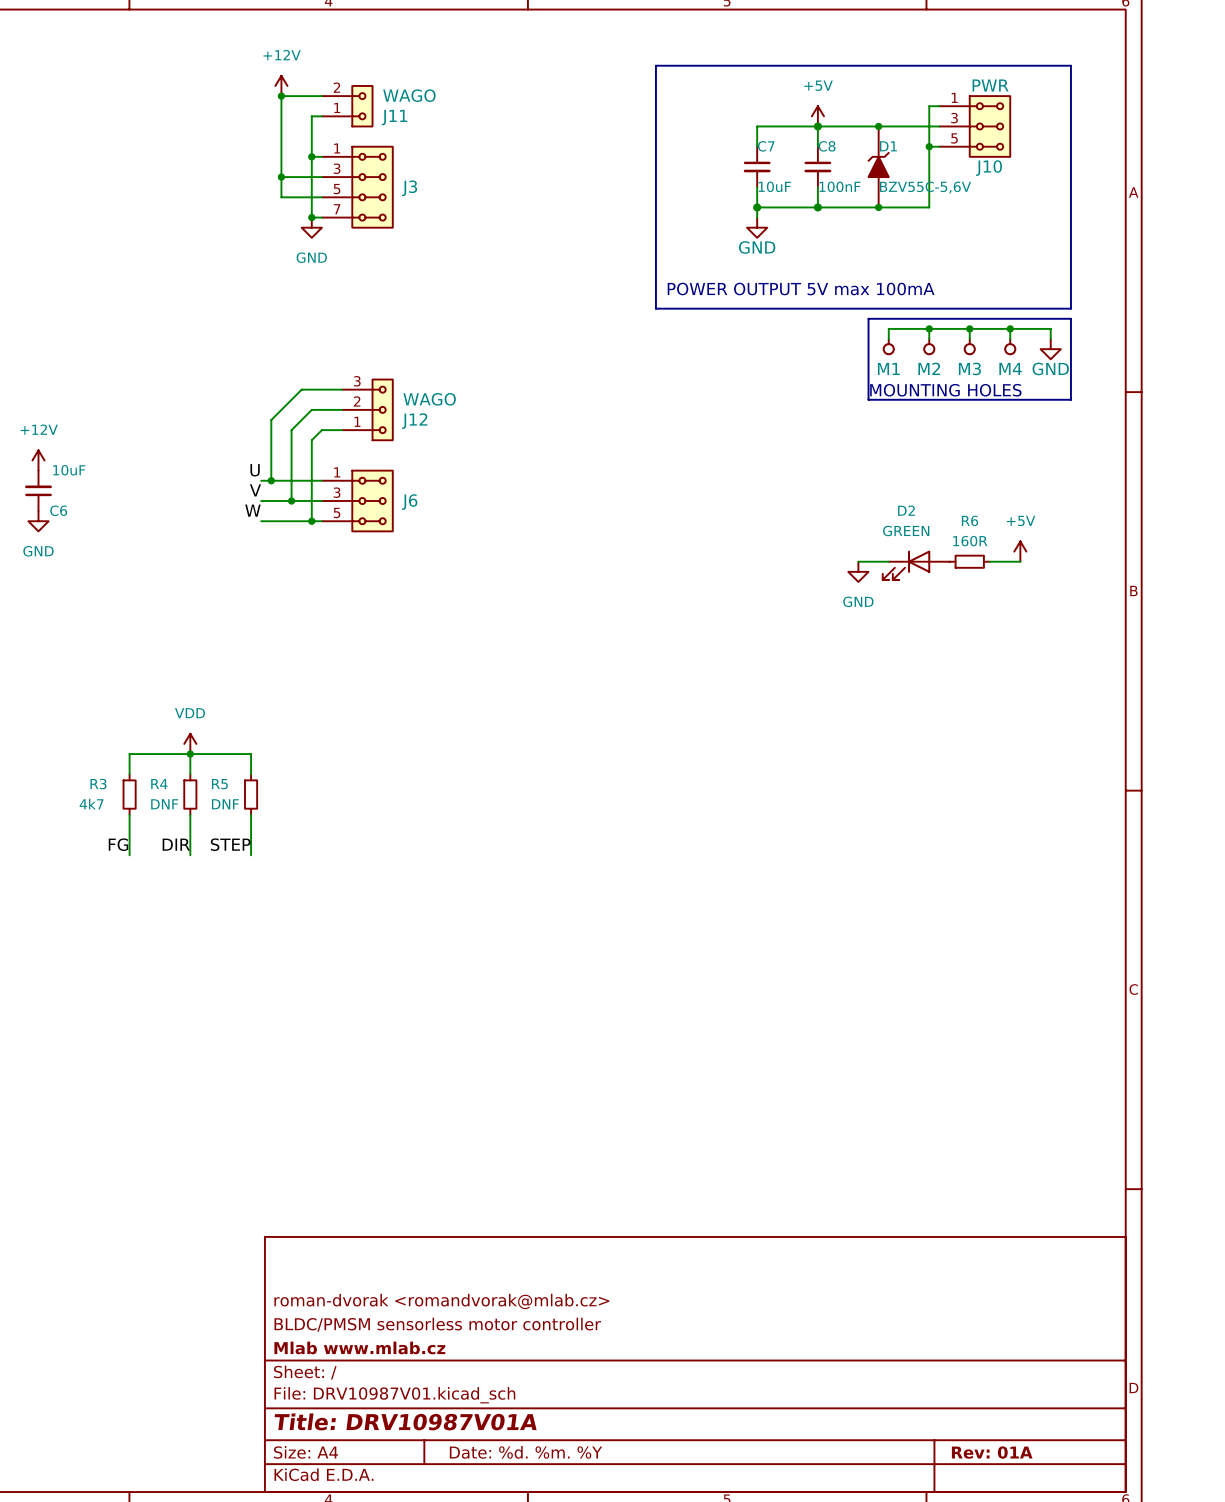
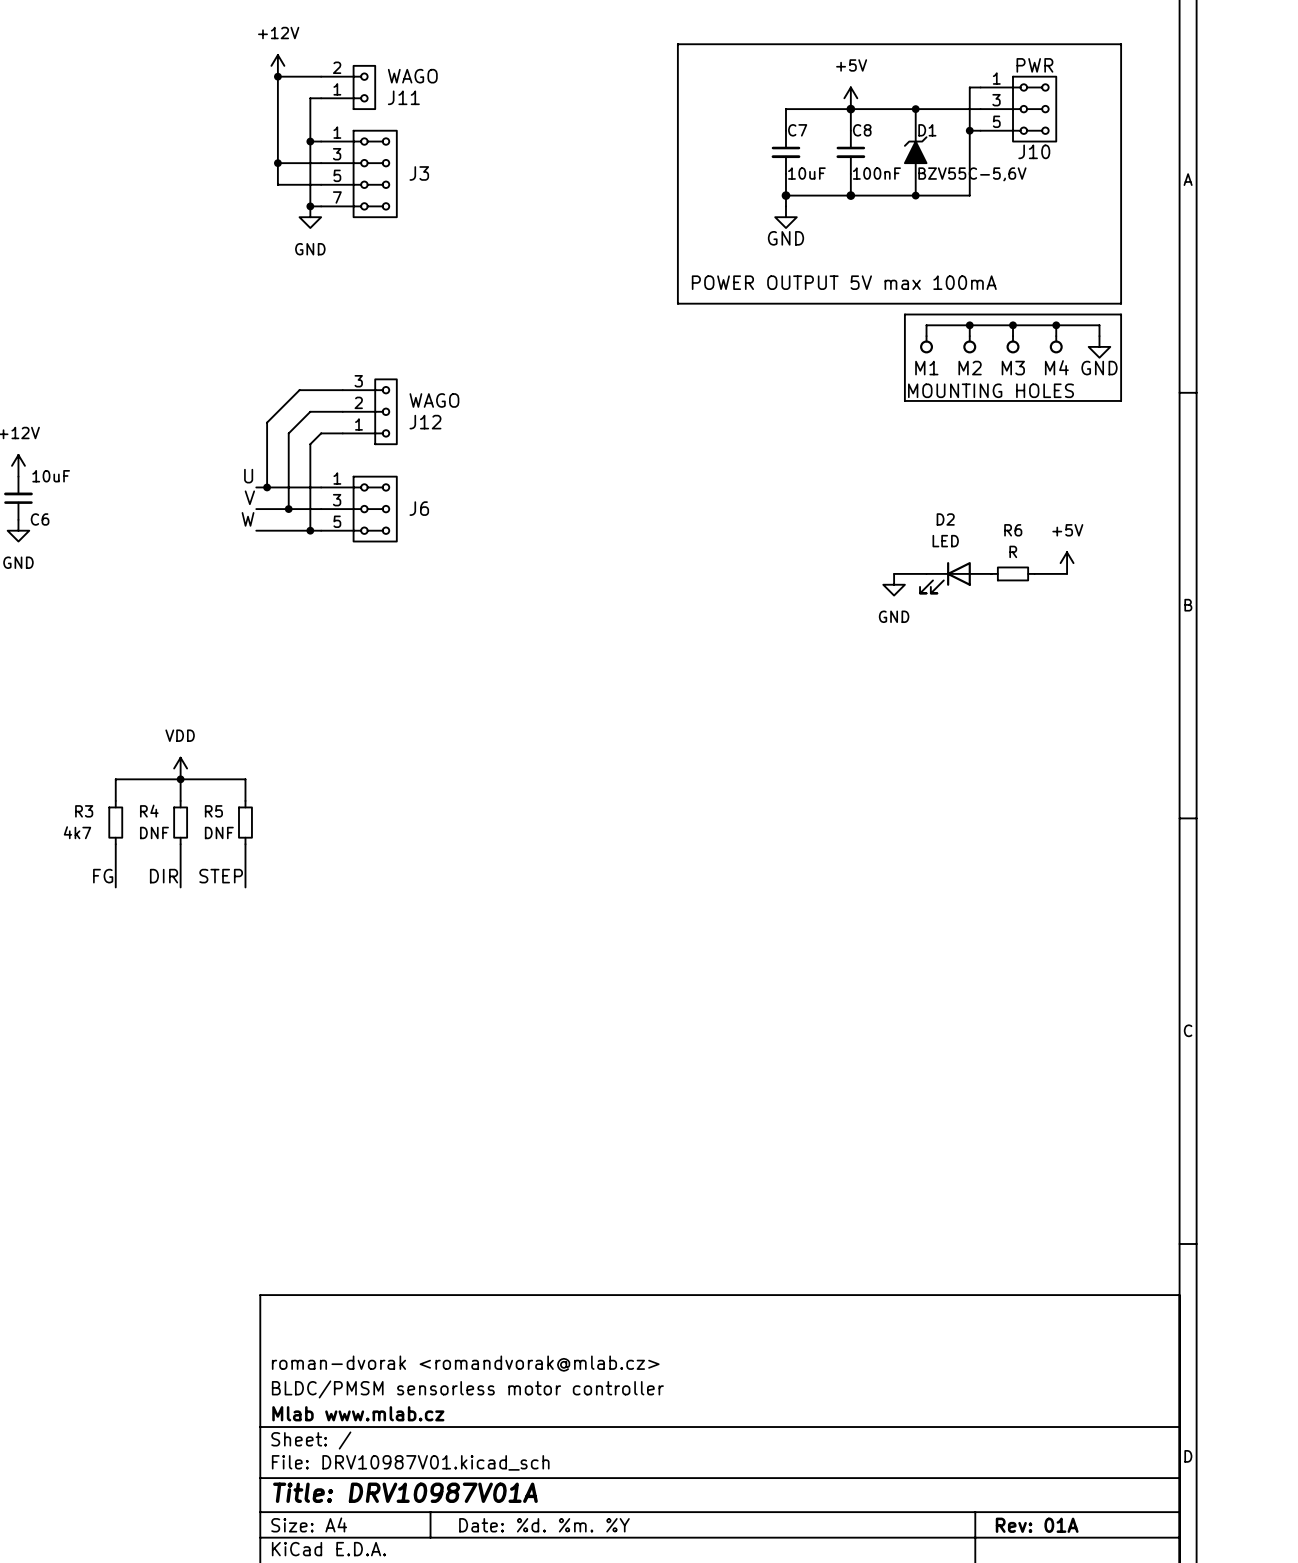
D2 value: GREEN (906, 530) -> LED (945, 541)
R6 value: 160R (970, 541) -> R (1013, 551)

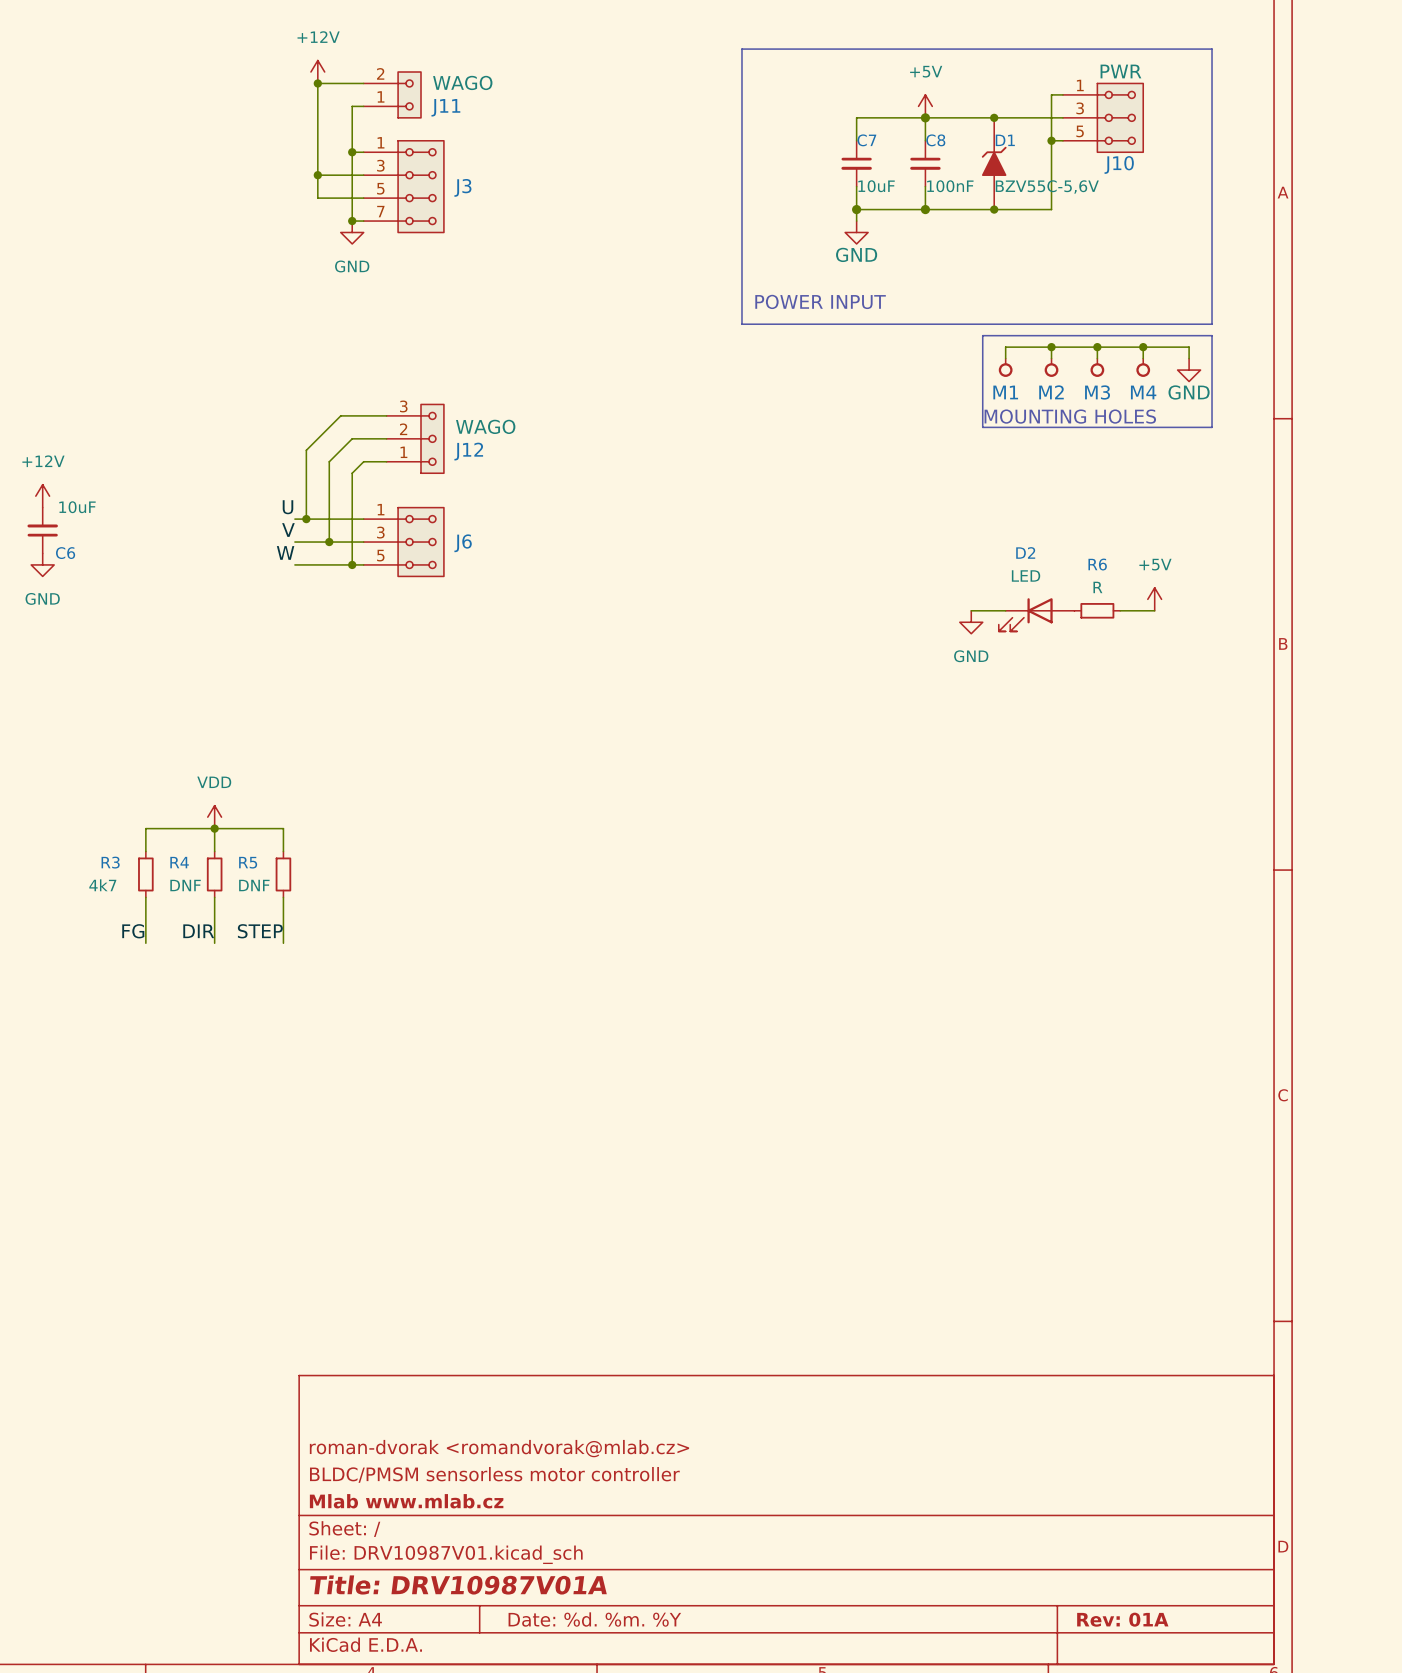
text: POWER OUTPUT 5V max 100mA (844, 282) -> POWER INPUT (820, 301)

